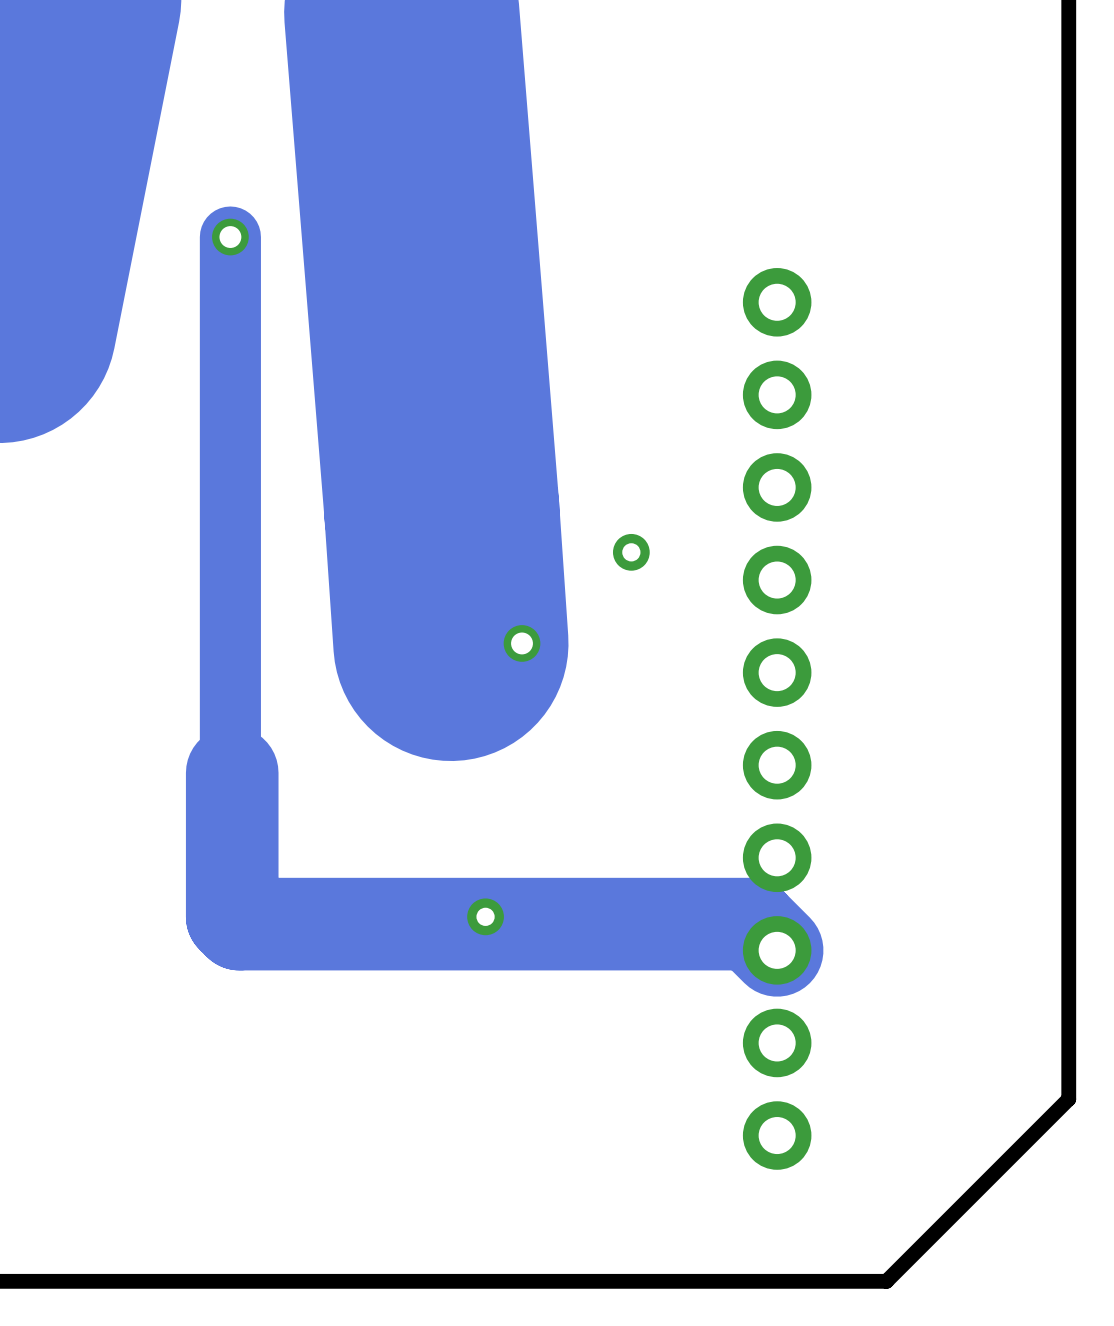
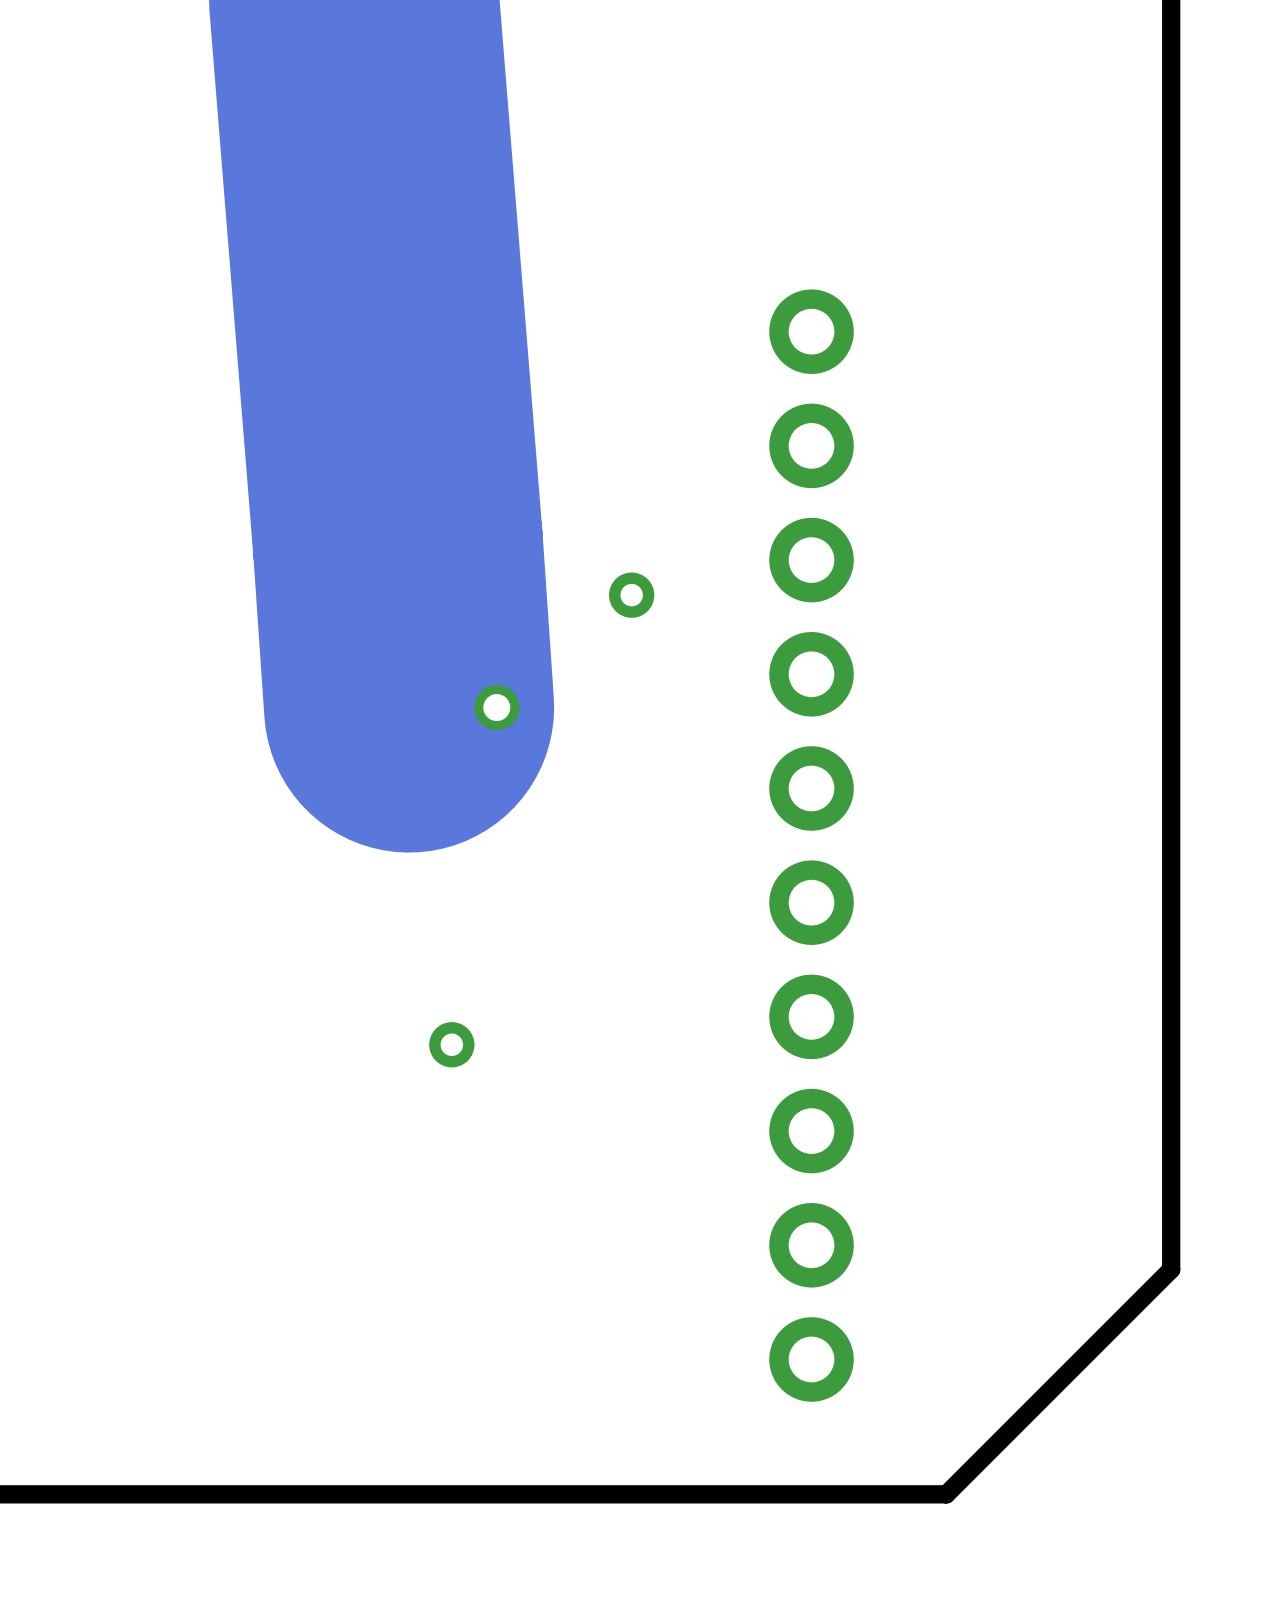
track: (230, 237) (232, 916) (239, 924) (750, 924) (777, 950) -> none
via: (230, 237) -> none
part position: (777, 718) -> (811, 845)

